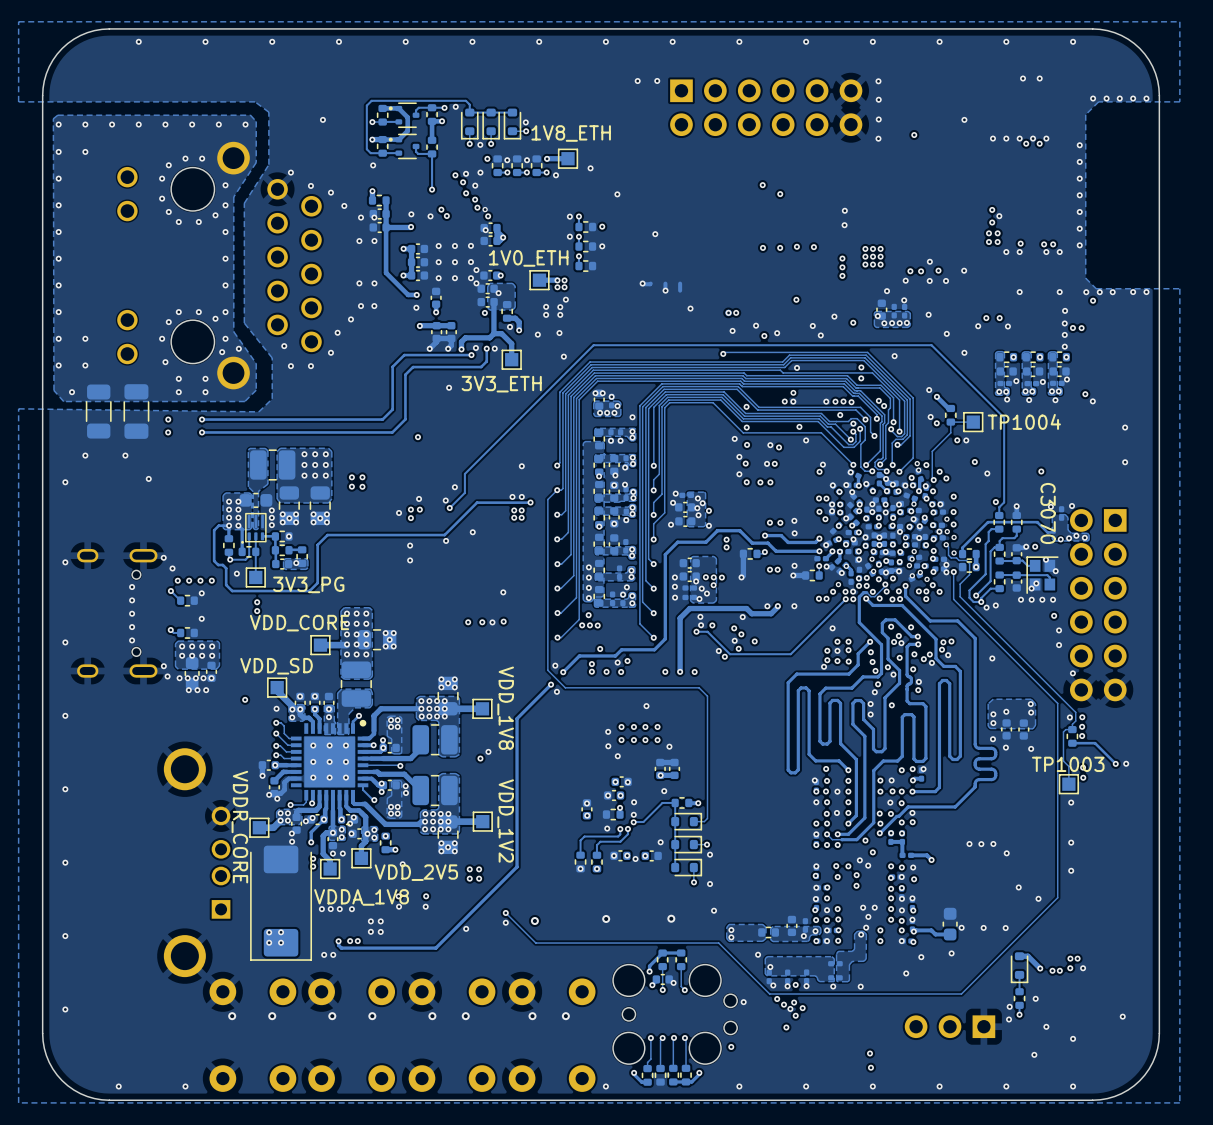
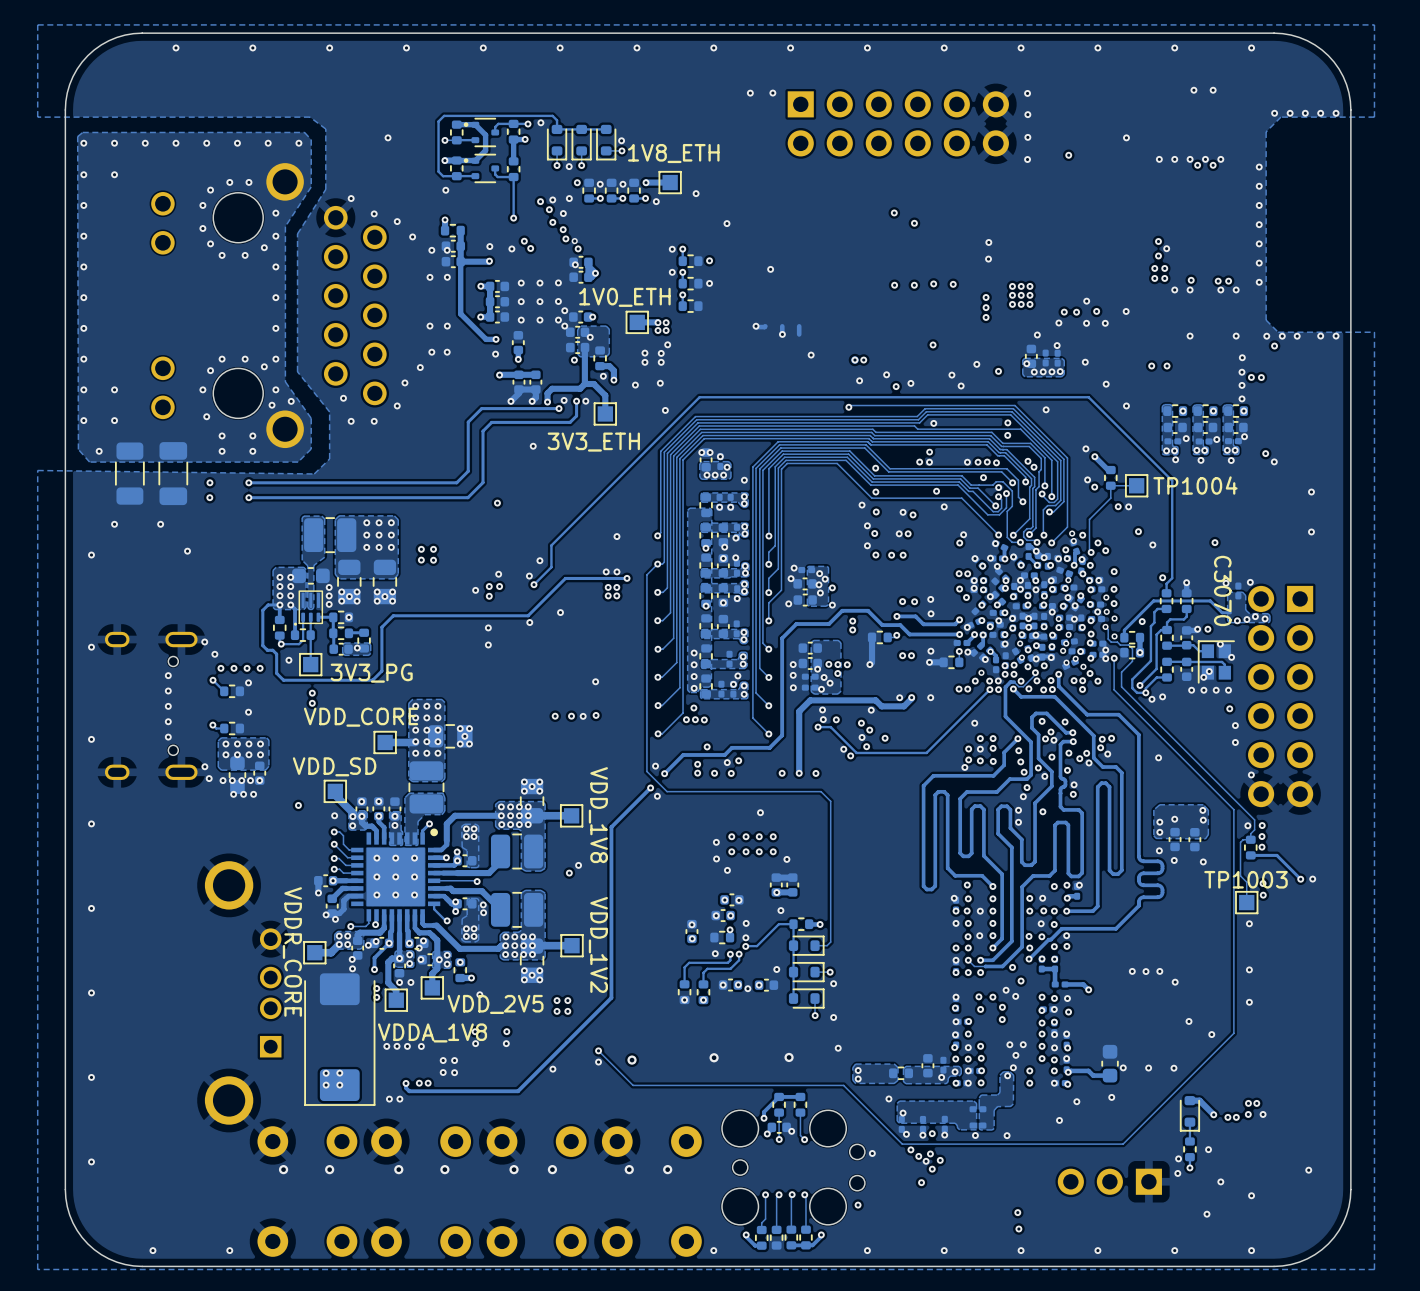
via: (978, 326) -> none
via: (1007, 326) -> none

